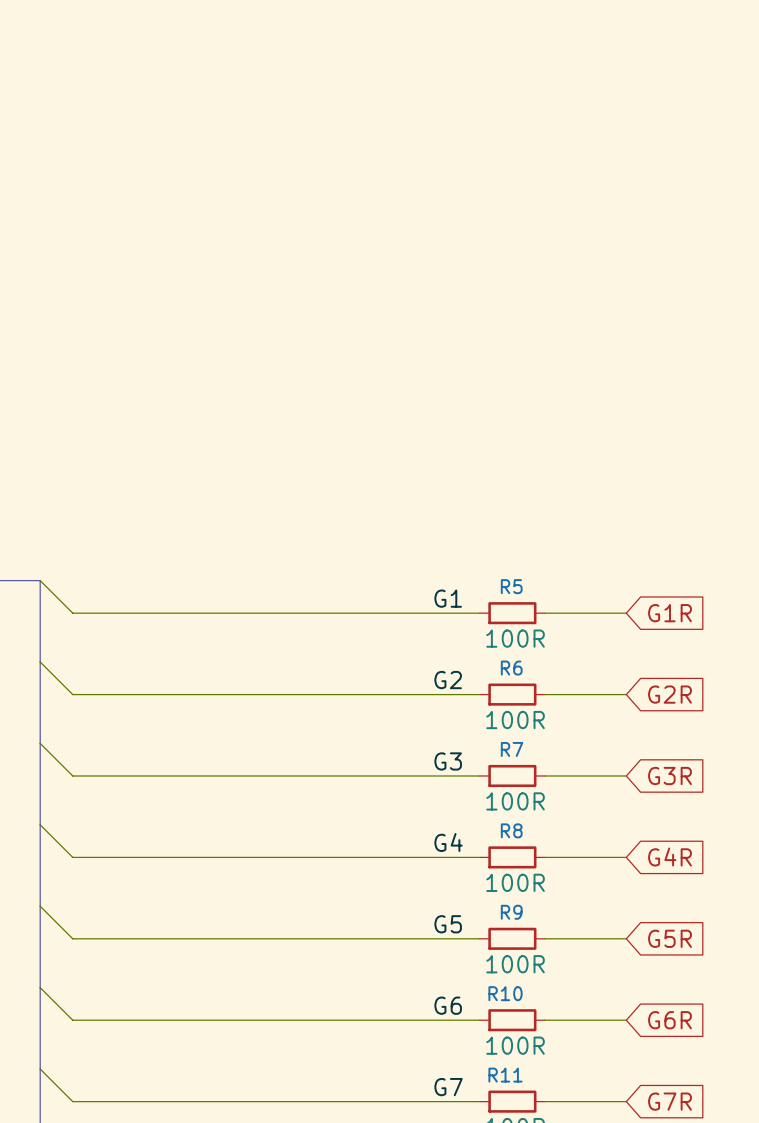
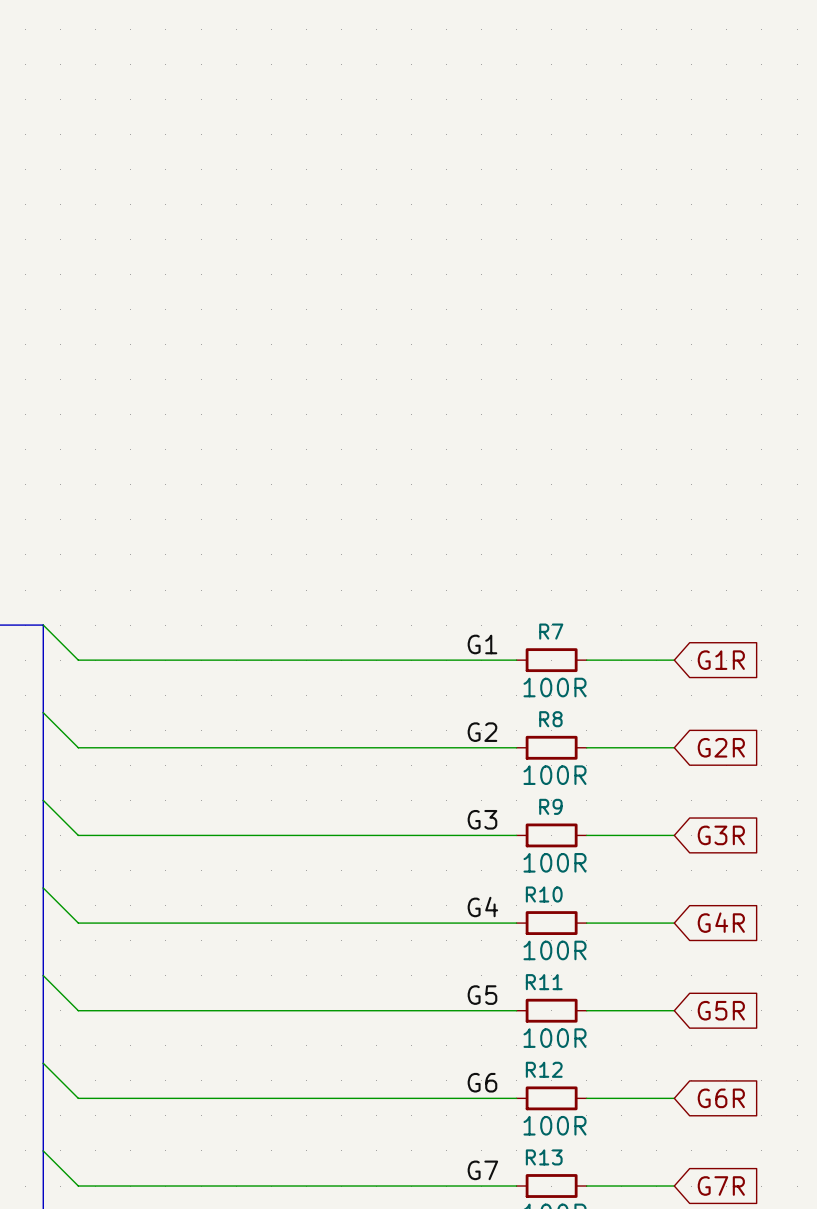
R5 name: R5 (511, 586) -> R7 (551, 631)
R6 name: R6 (511, 668) -> R8 (550, 719)
R7 name: R7 (512, 749) -> R9 (550, 806)
R8 name: R8 (511, 830) -> R10 (544, 894)
R9 name: R9 (511, 912) -> R11 (544, 982)
R10 name: R10 (505, 993) -> R12 (544, 1069)
R11 name: R11 (505, 1075) -> R13 (544, 1157)

